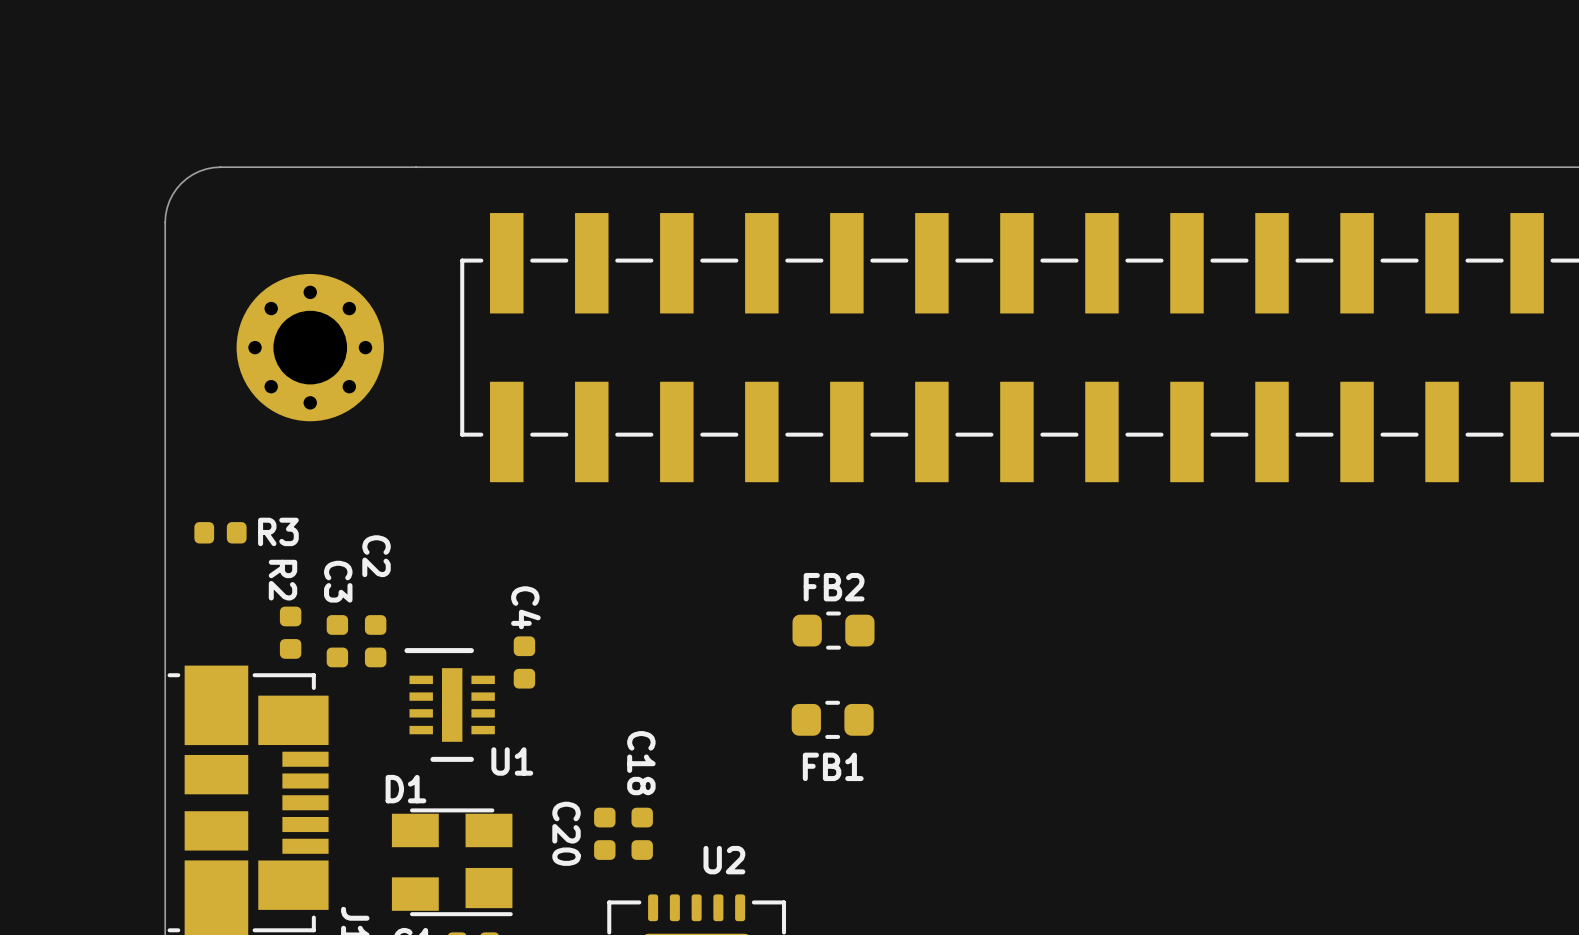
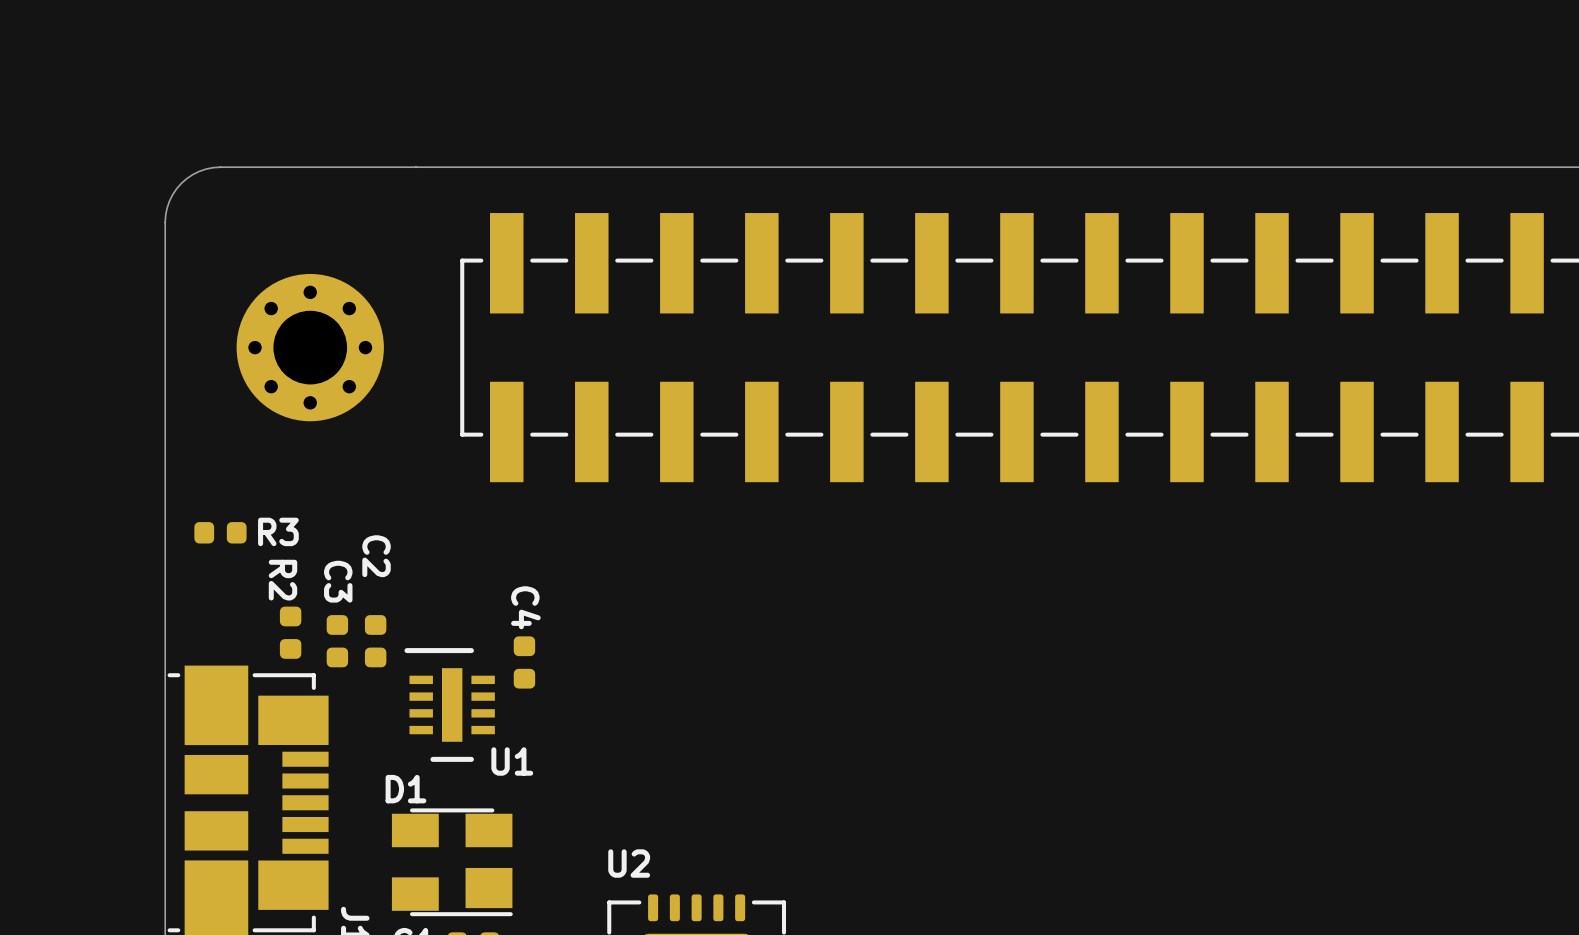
FB2: (833, 630) -> none
FB1: (832, 719) -> none
C20: (604, 833) -> none
C18: (642, 833) -> none
U2 name position: U2 (724, 860) -> U2 (629, 863)

